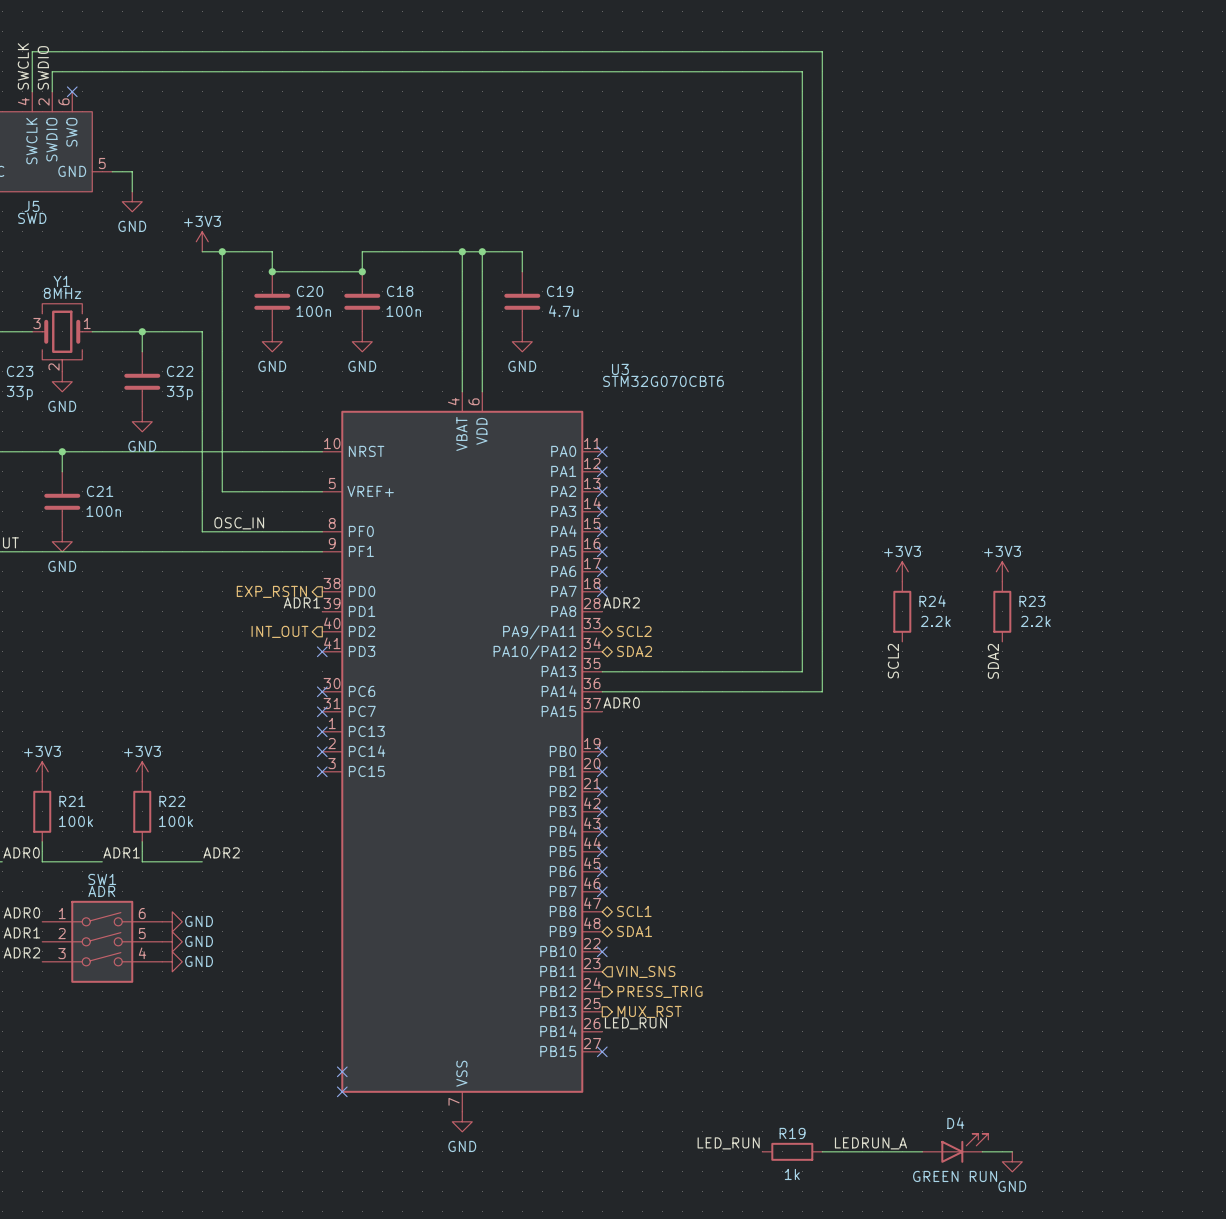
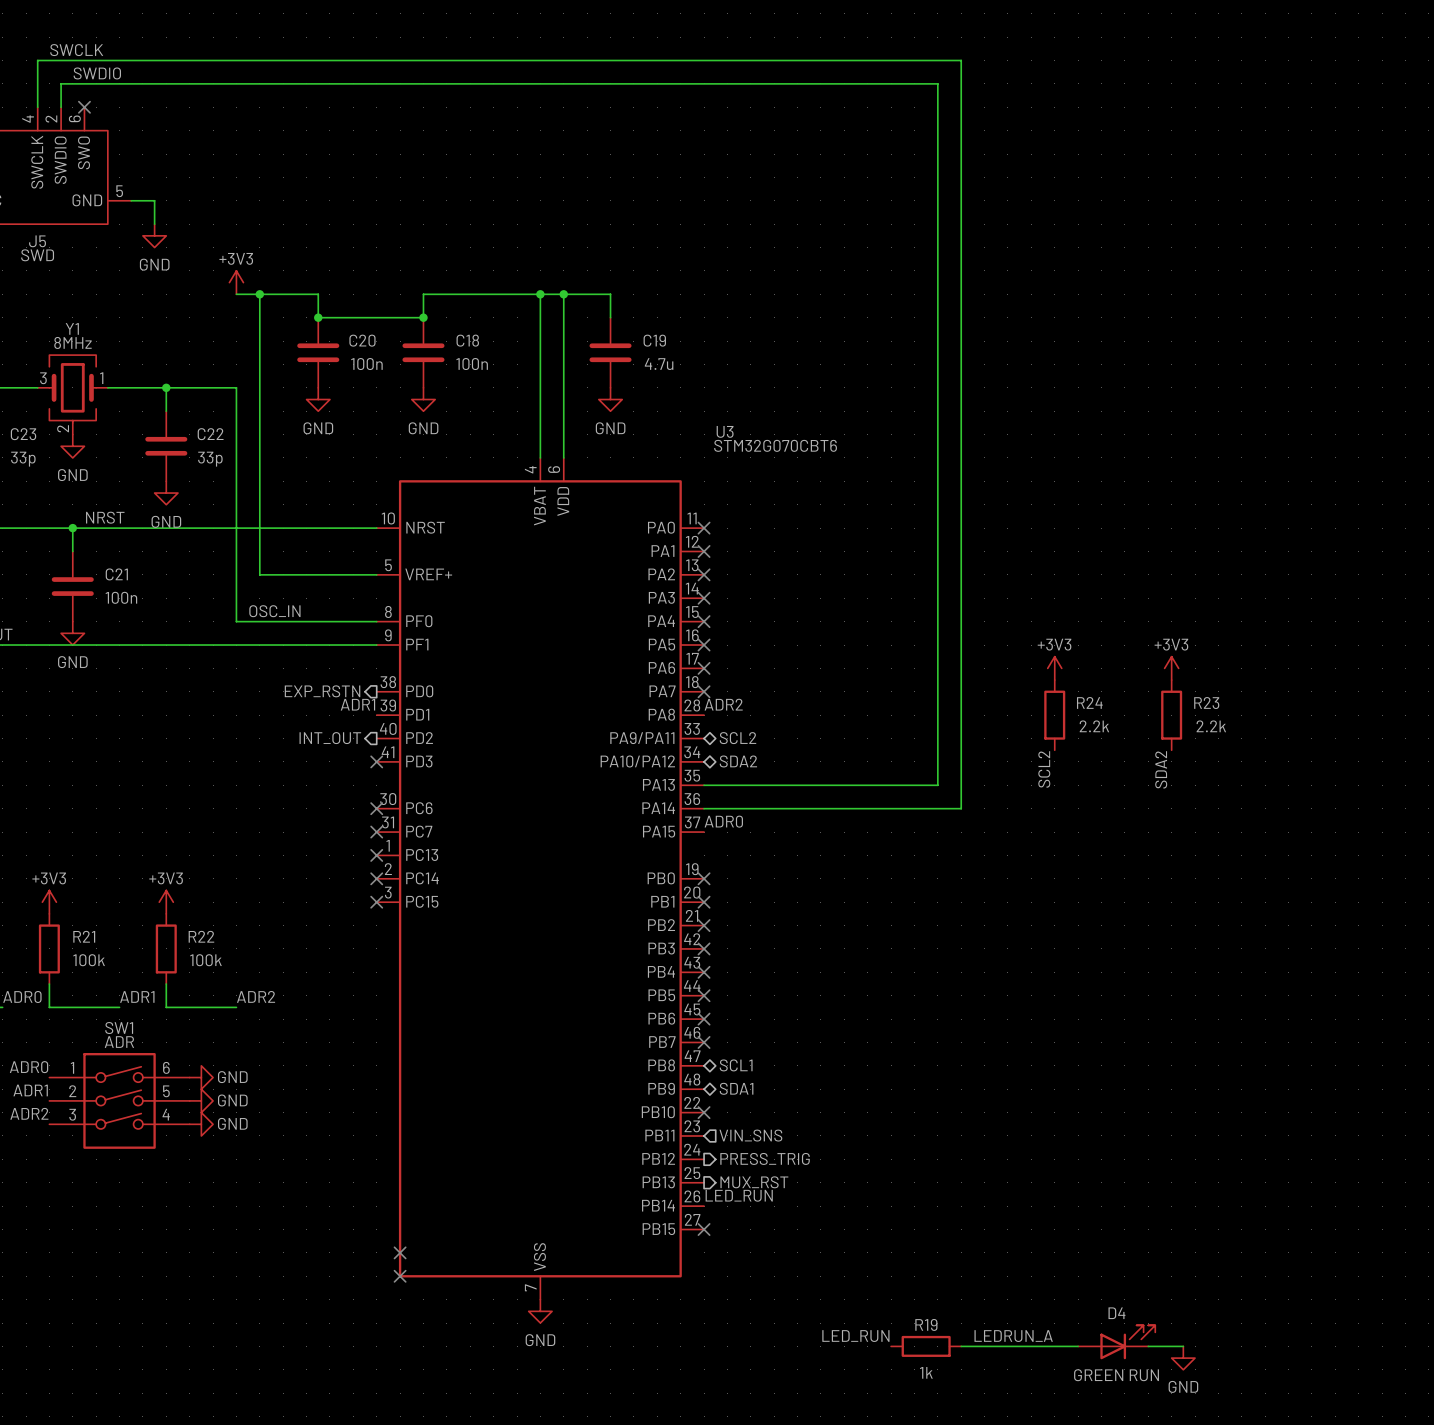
label rotation: 0° (23, 66) -> 90° clockwise (76, 50)
label rotation: 0° (43, 67) -> 90° clockwise (97, 73)
label: none -> NRST (105, 517)

